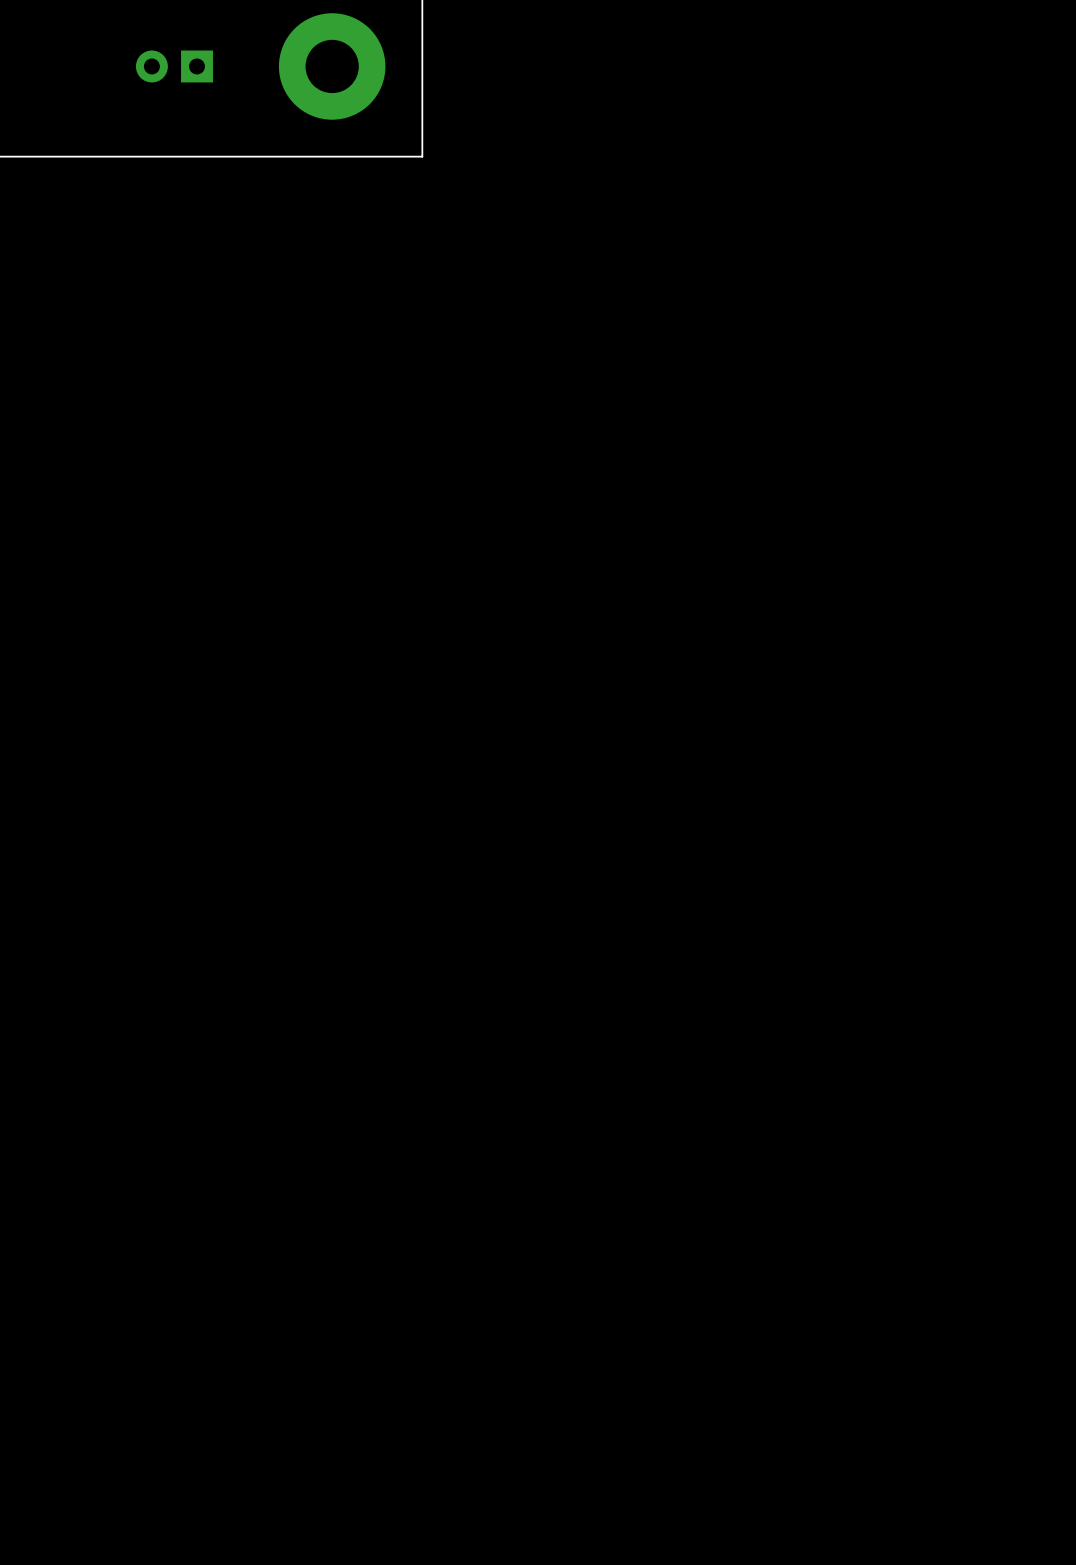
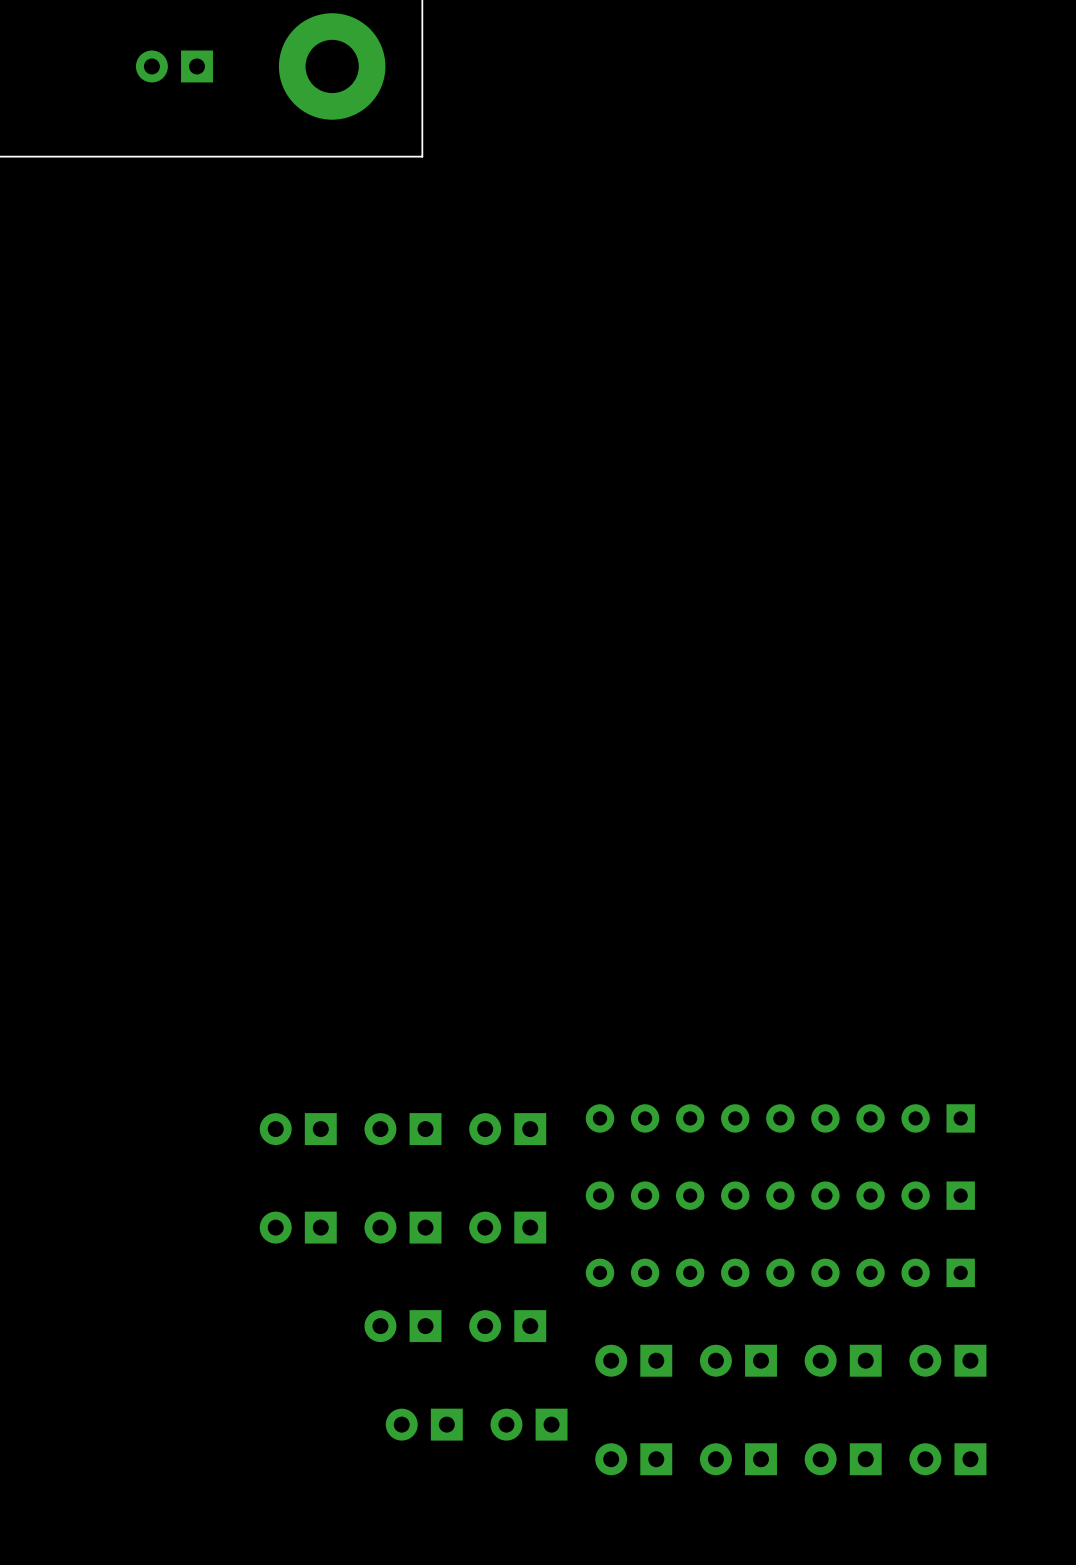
part: none -> (780, 1118)
part: none -> (298, 1129)
part: none -> (402, 1129)
part: none -> (507, 1129)
part: none -> (780, 1195)
part: none -> (298, 1227)
part: none -> (402, 1227)
part: none -> (507, 1227)
part: none -> (780, 1272)
part: none -> (402, 1326)
part: none -> (507, 1326)
part: none -> (633, 1360)
part: none -> (738, 1360)
part: none -> (843, 1360)
part: none -> (947, 1360)
part: none -> (424, 1424)
part: none -> (529, 1424)
part: none -> (633, 1459)
part: none -> (738, 1459)
part: none -> (843, 1459)
part: none -> (947, 1459)

